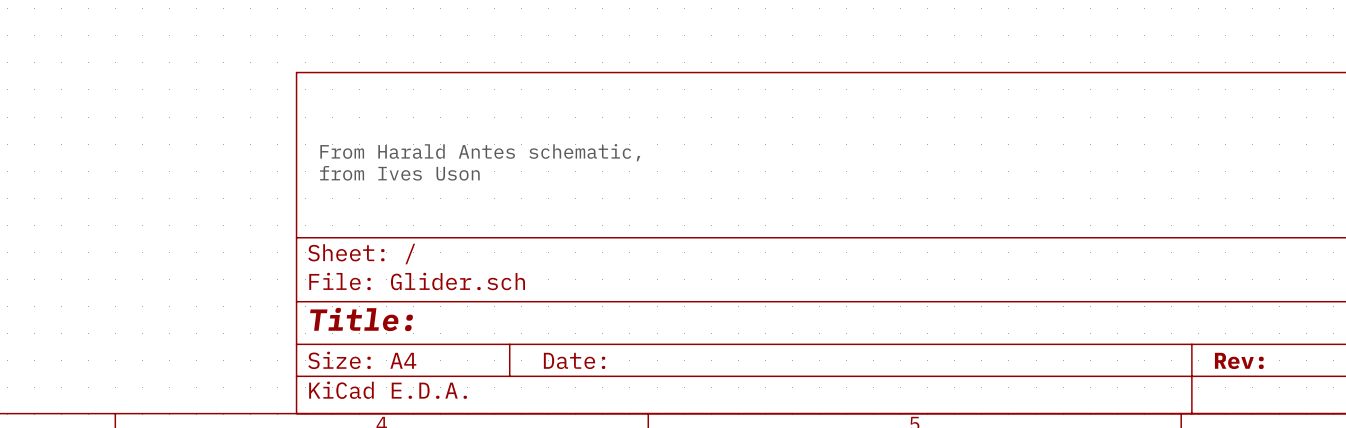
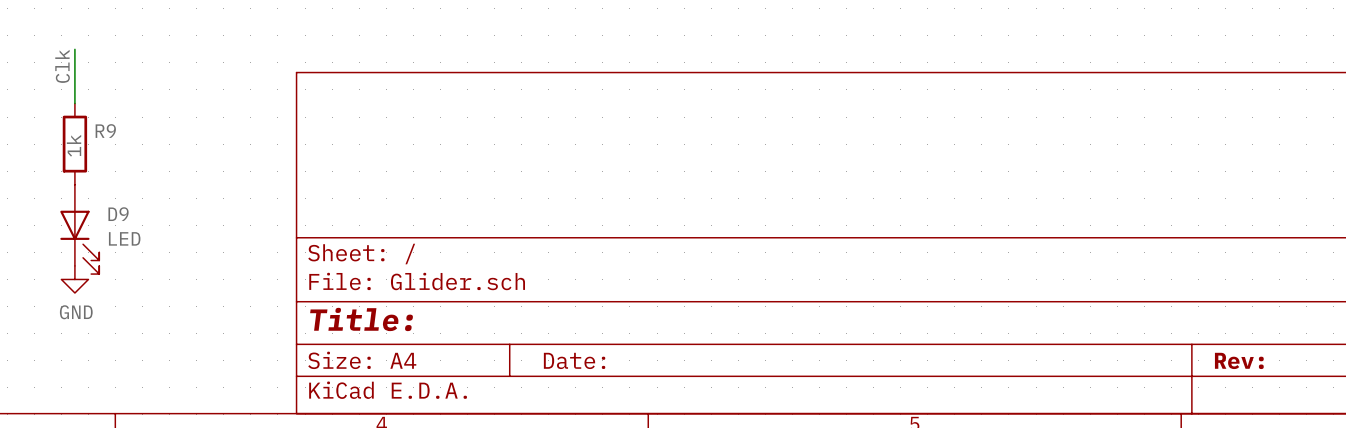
wire: none -> (74, 49) (74, 103)
label: none -> Clk (62, 66)
R9: none -> 1k (74, 144)
text: From Harald Antes schematic, (480, 152) -> none
text: from Ives Uson (399, 173) -> none
D9: none -> LED (79, 229)
power symbol: none -> GND (74, 279)

